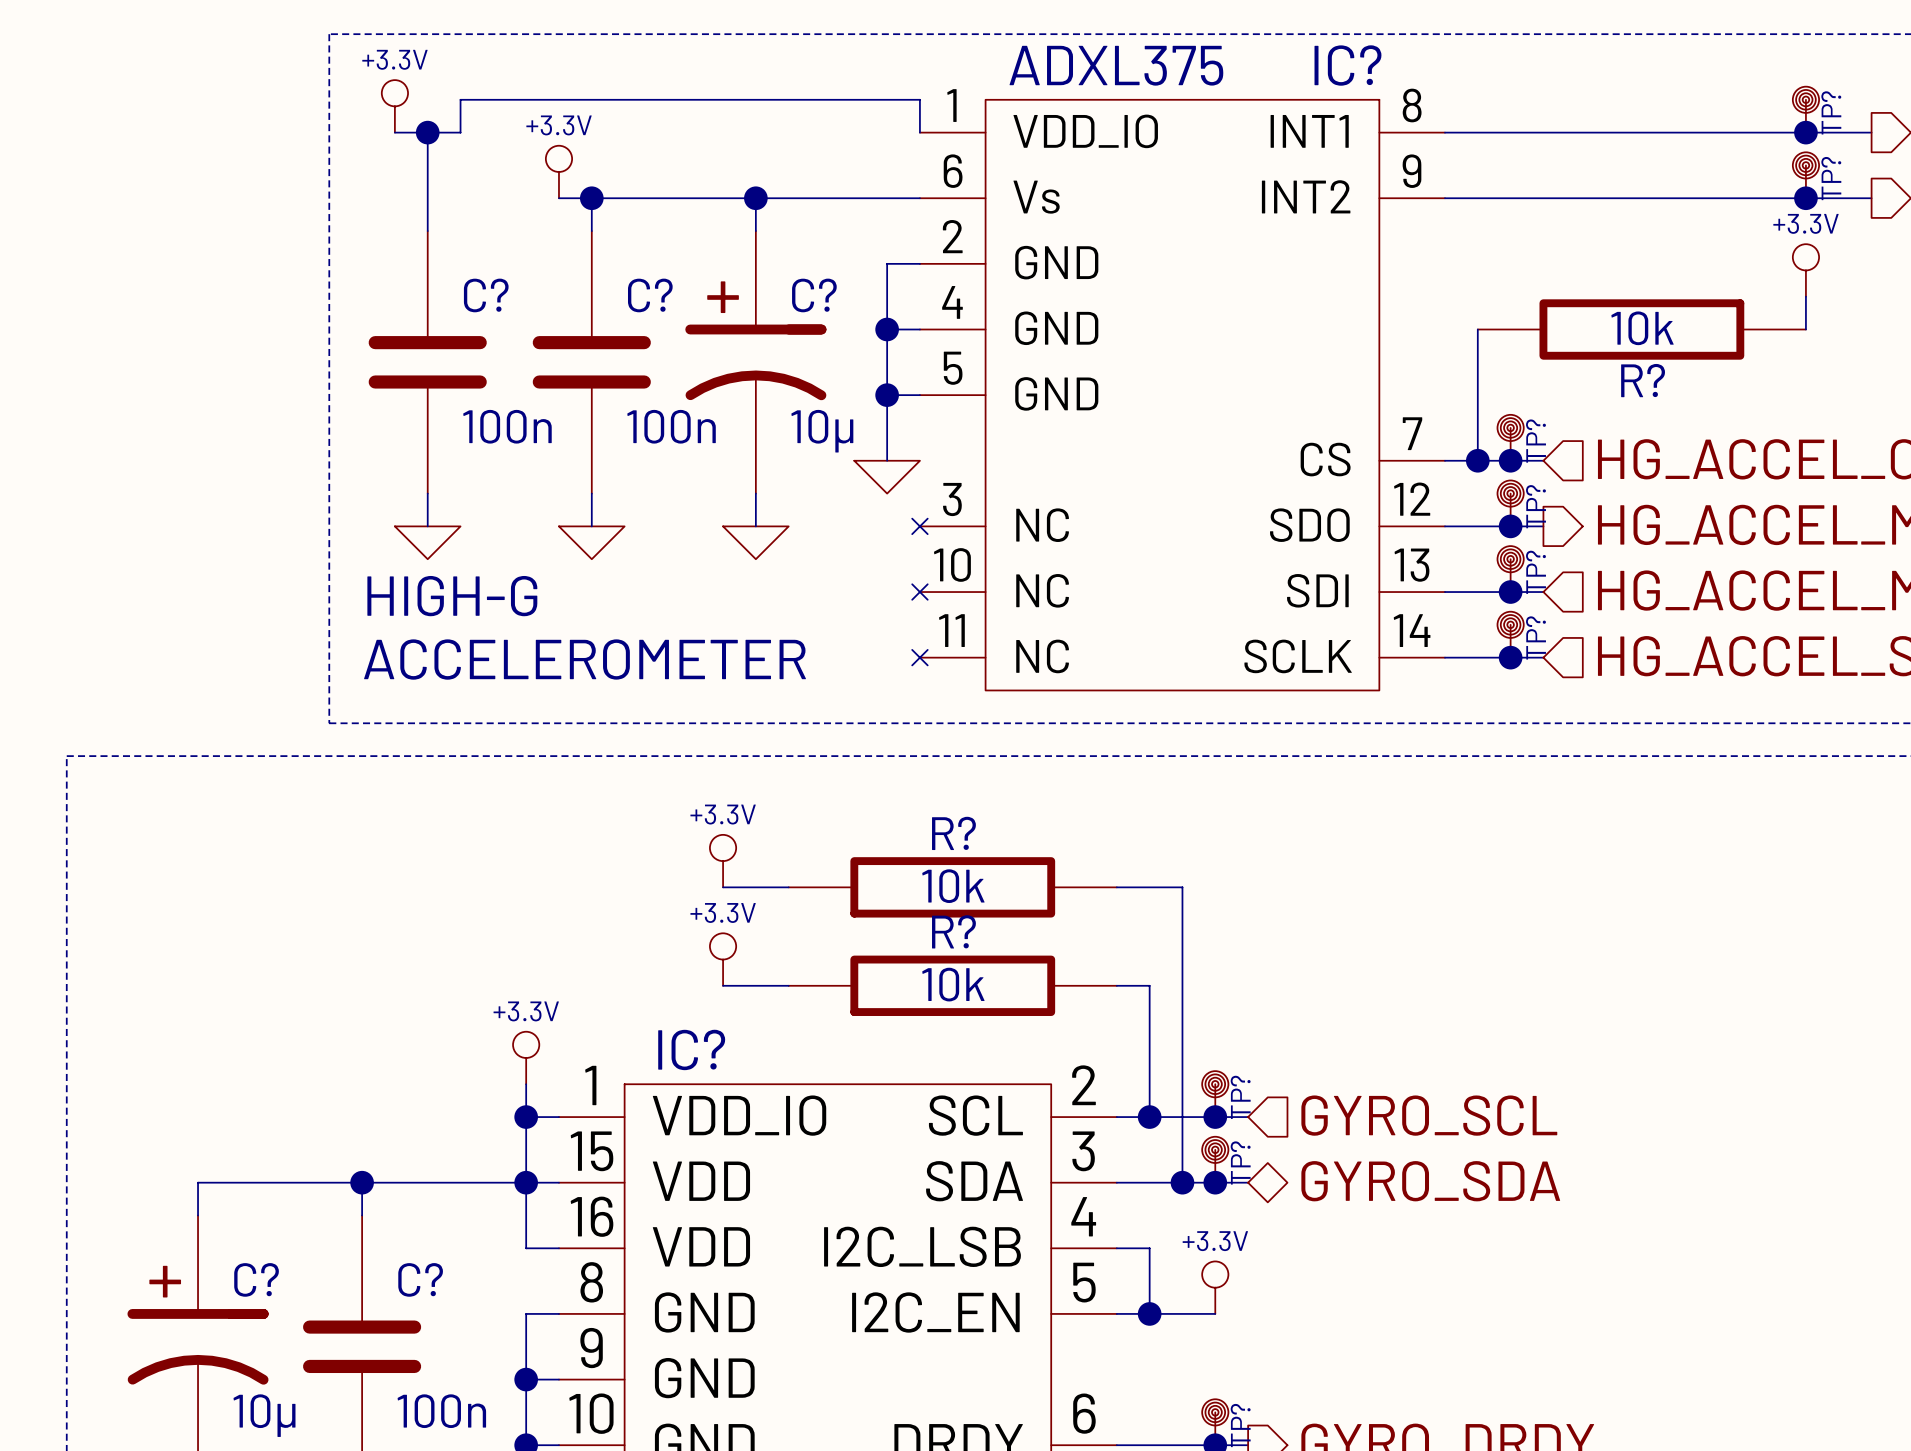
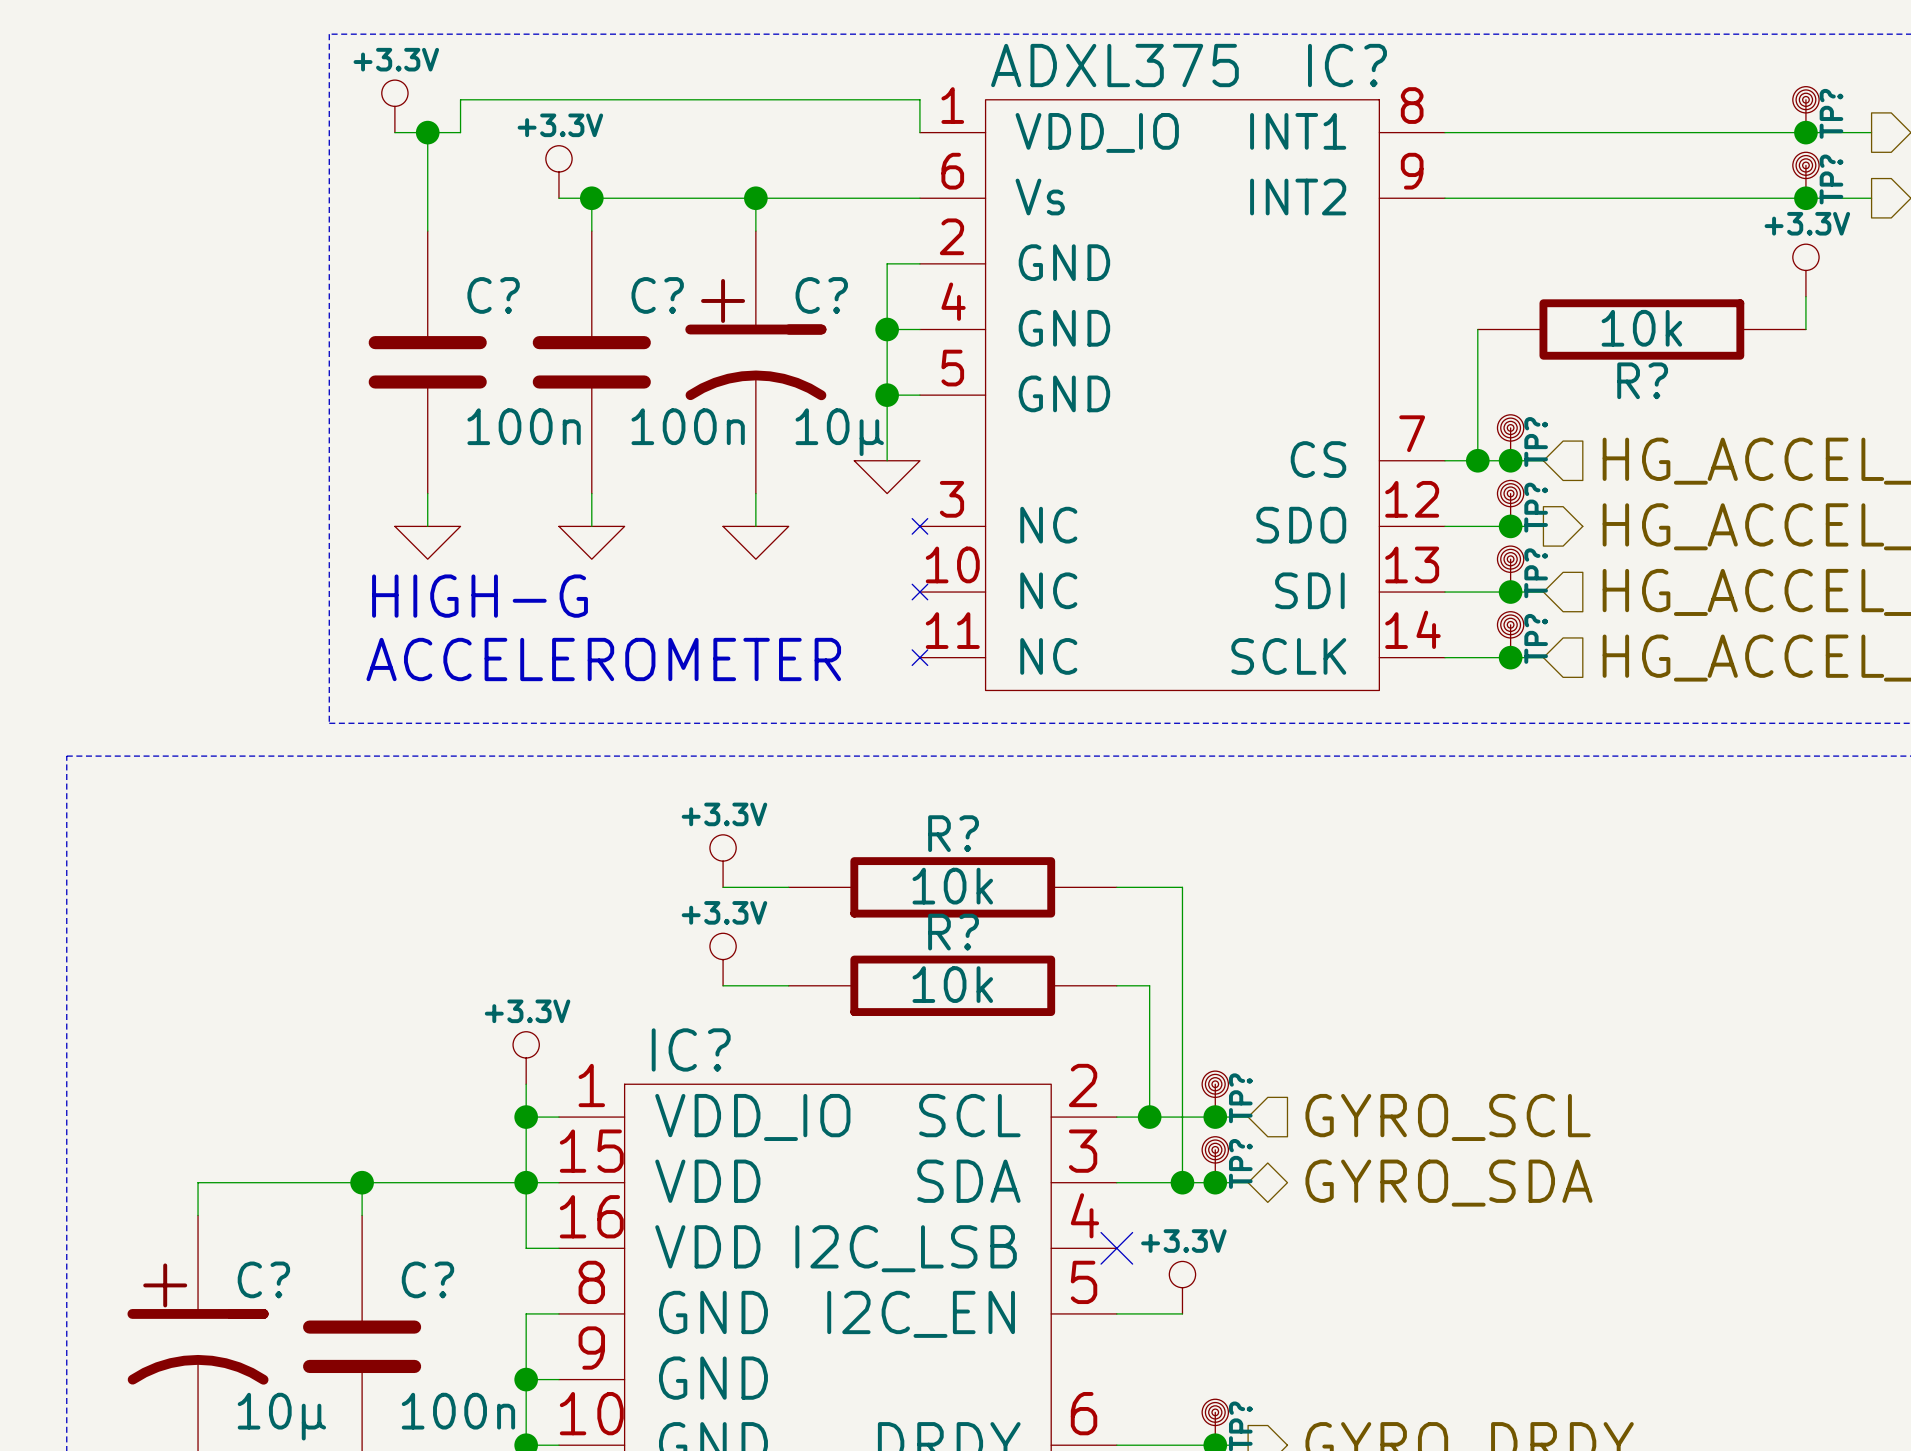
wire: (1116, 1248) (1149, 1248) (1149, 1313) -> none
no-connect mark: none -> (1116, 1248)
power symbol position: +3.3V (1215, 1287) -> +3.3V (1182, 1287)
junction: (1149, 1313) -> none
wire: (1182, 1313) (1215, 1313) -> none

